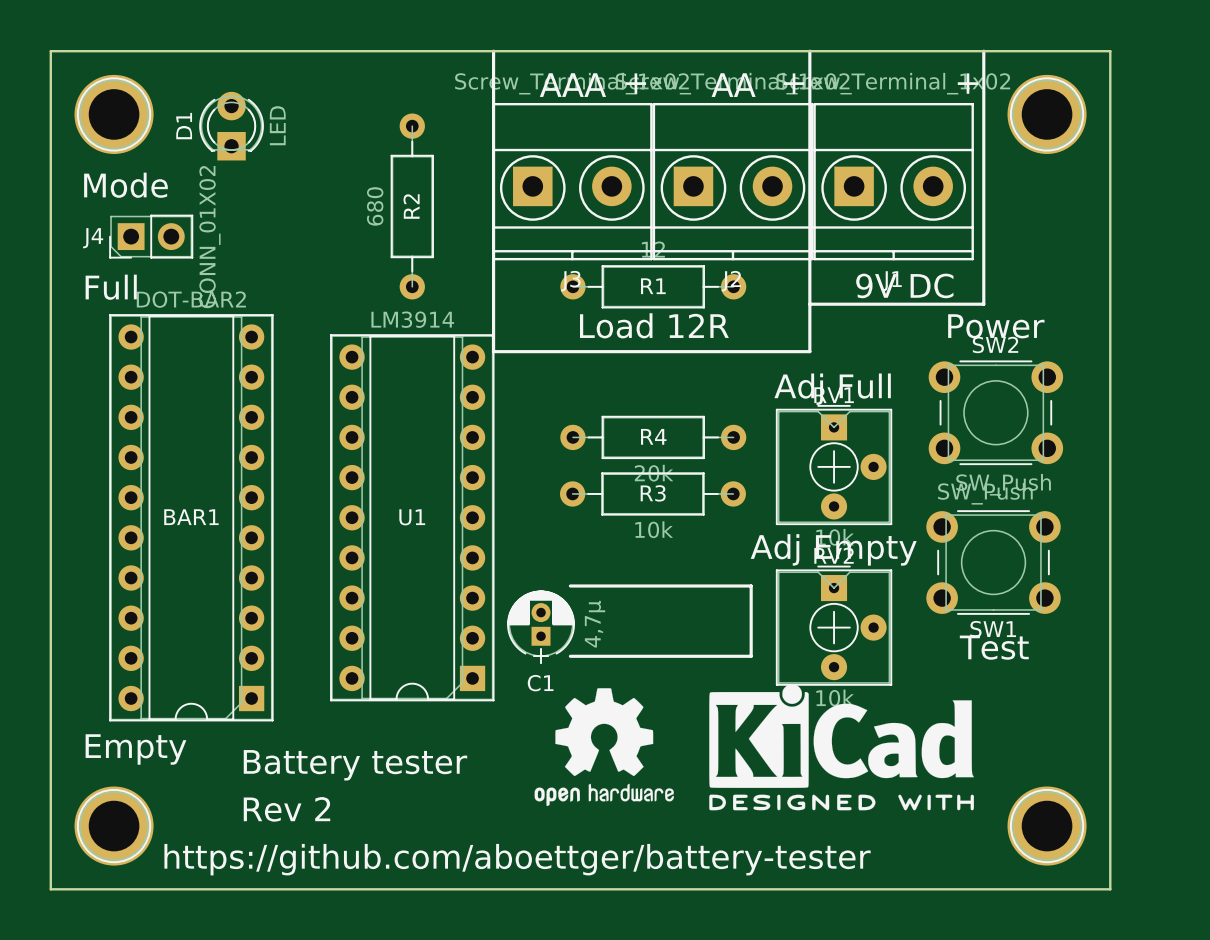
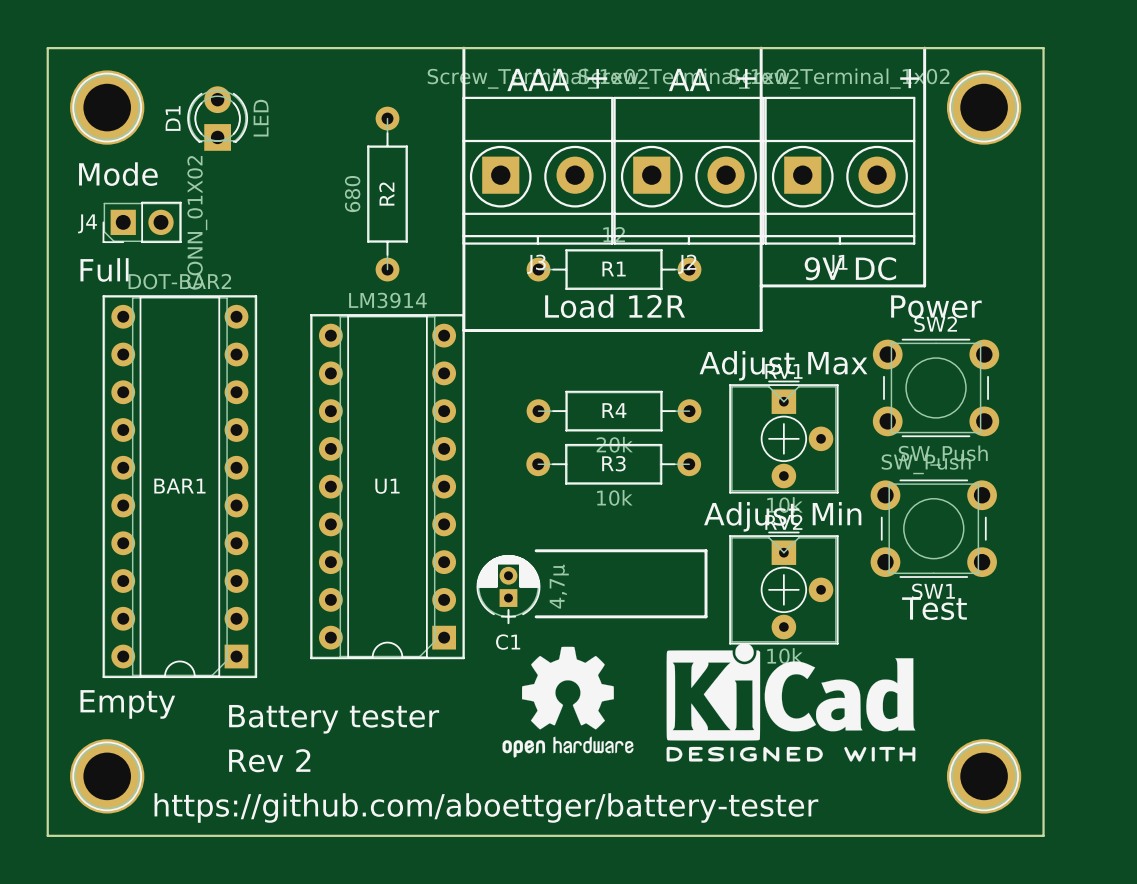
text: Adj Full (832, 389) -> Adjust Max (783, 365)
text: Adj Empty (833, 549) -> Adjust Min (782, 516)

